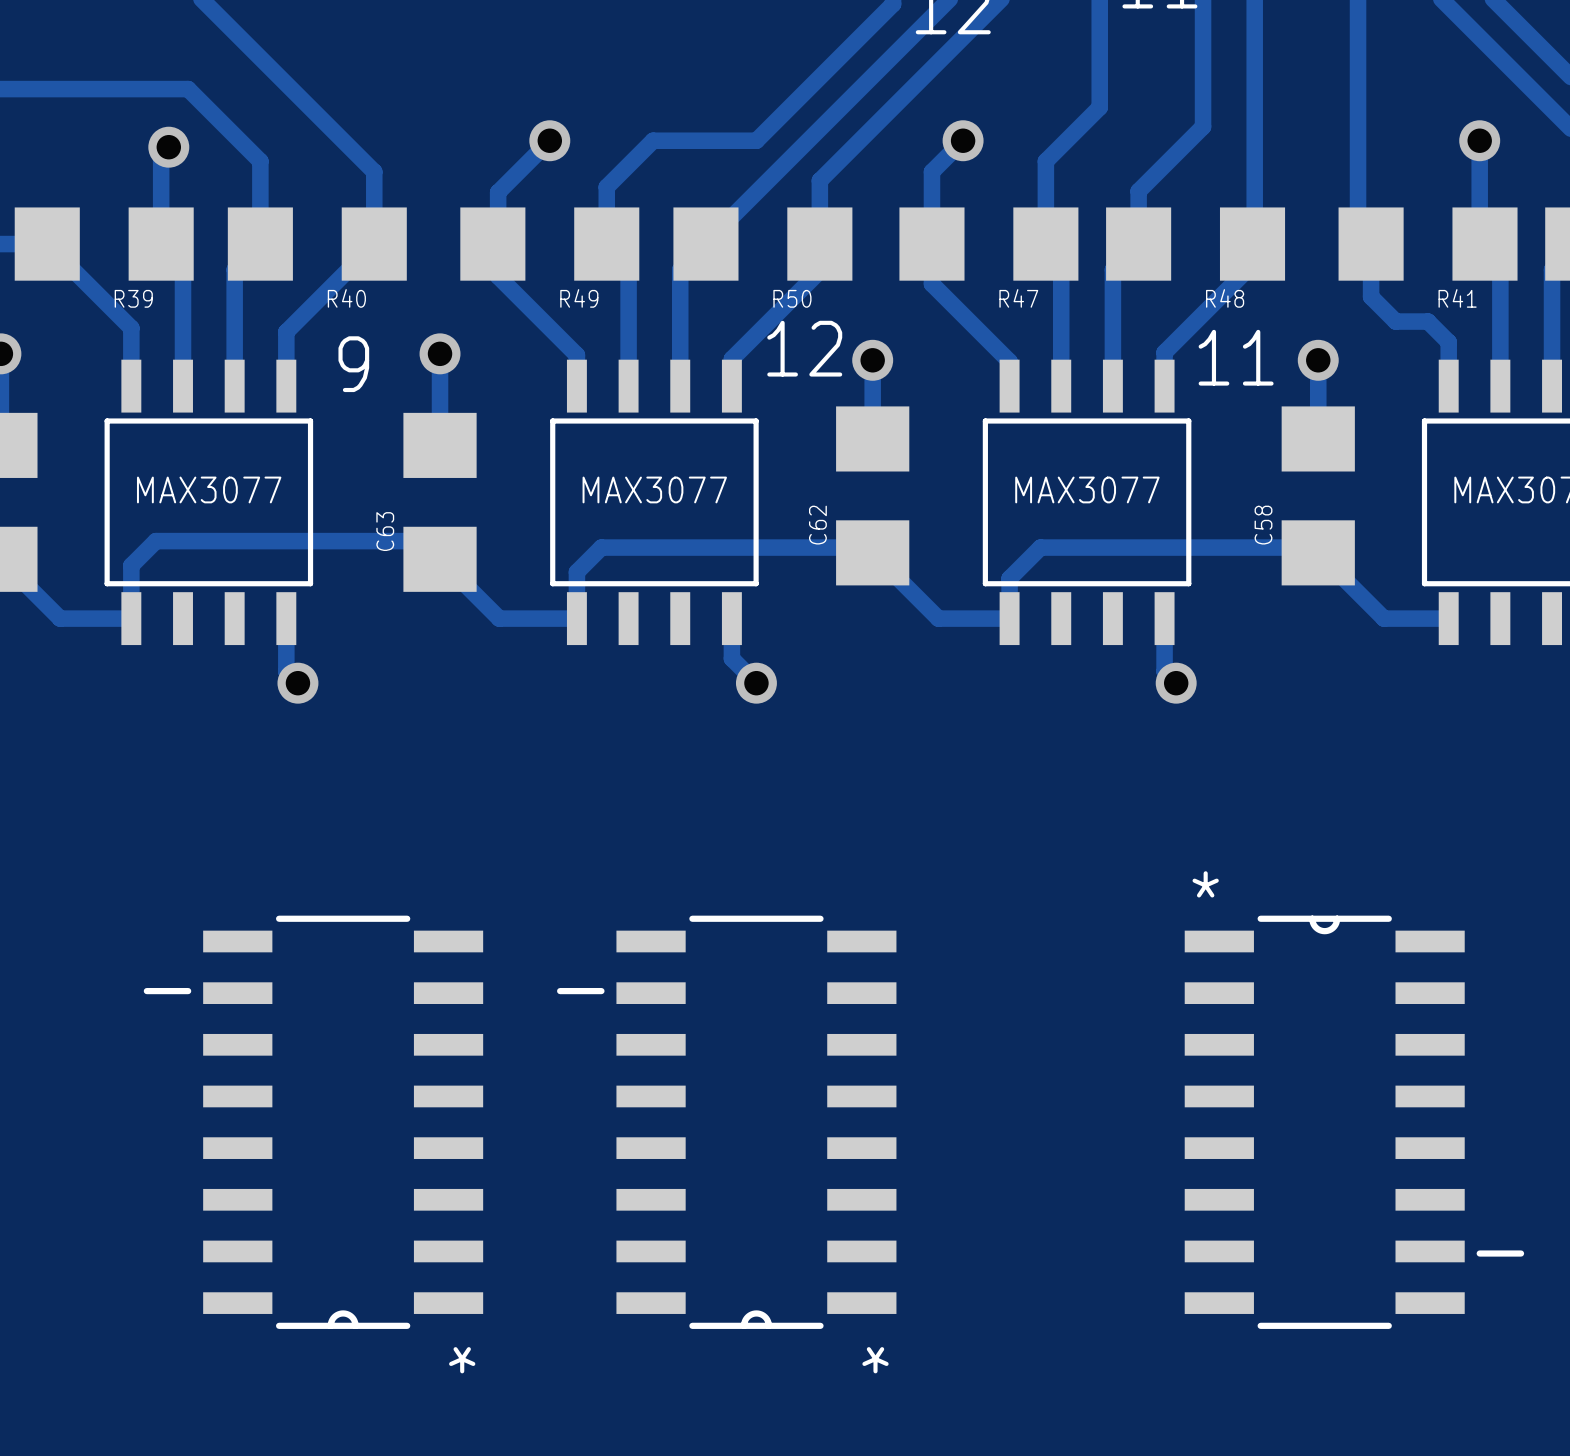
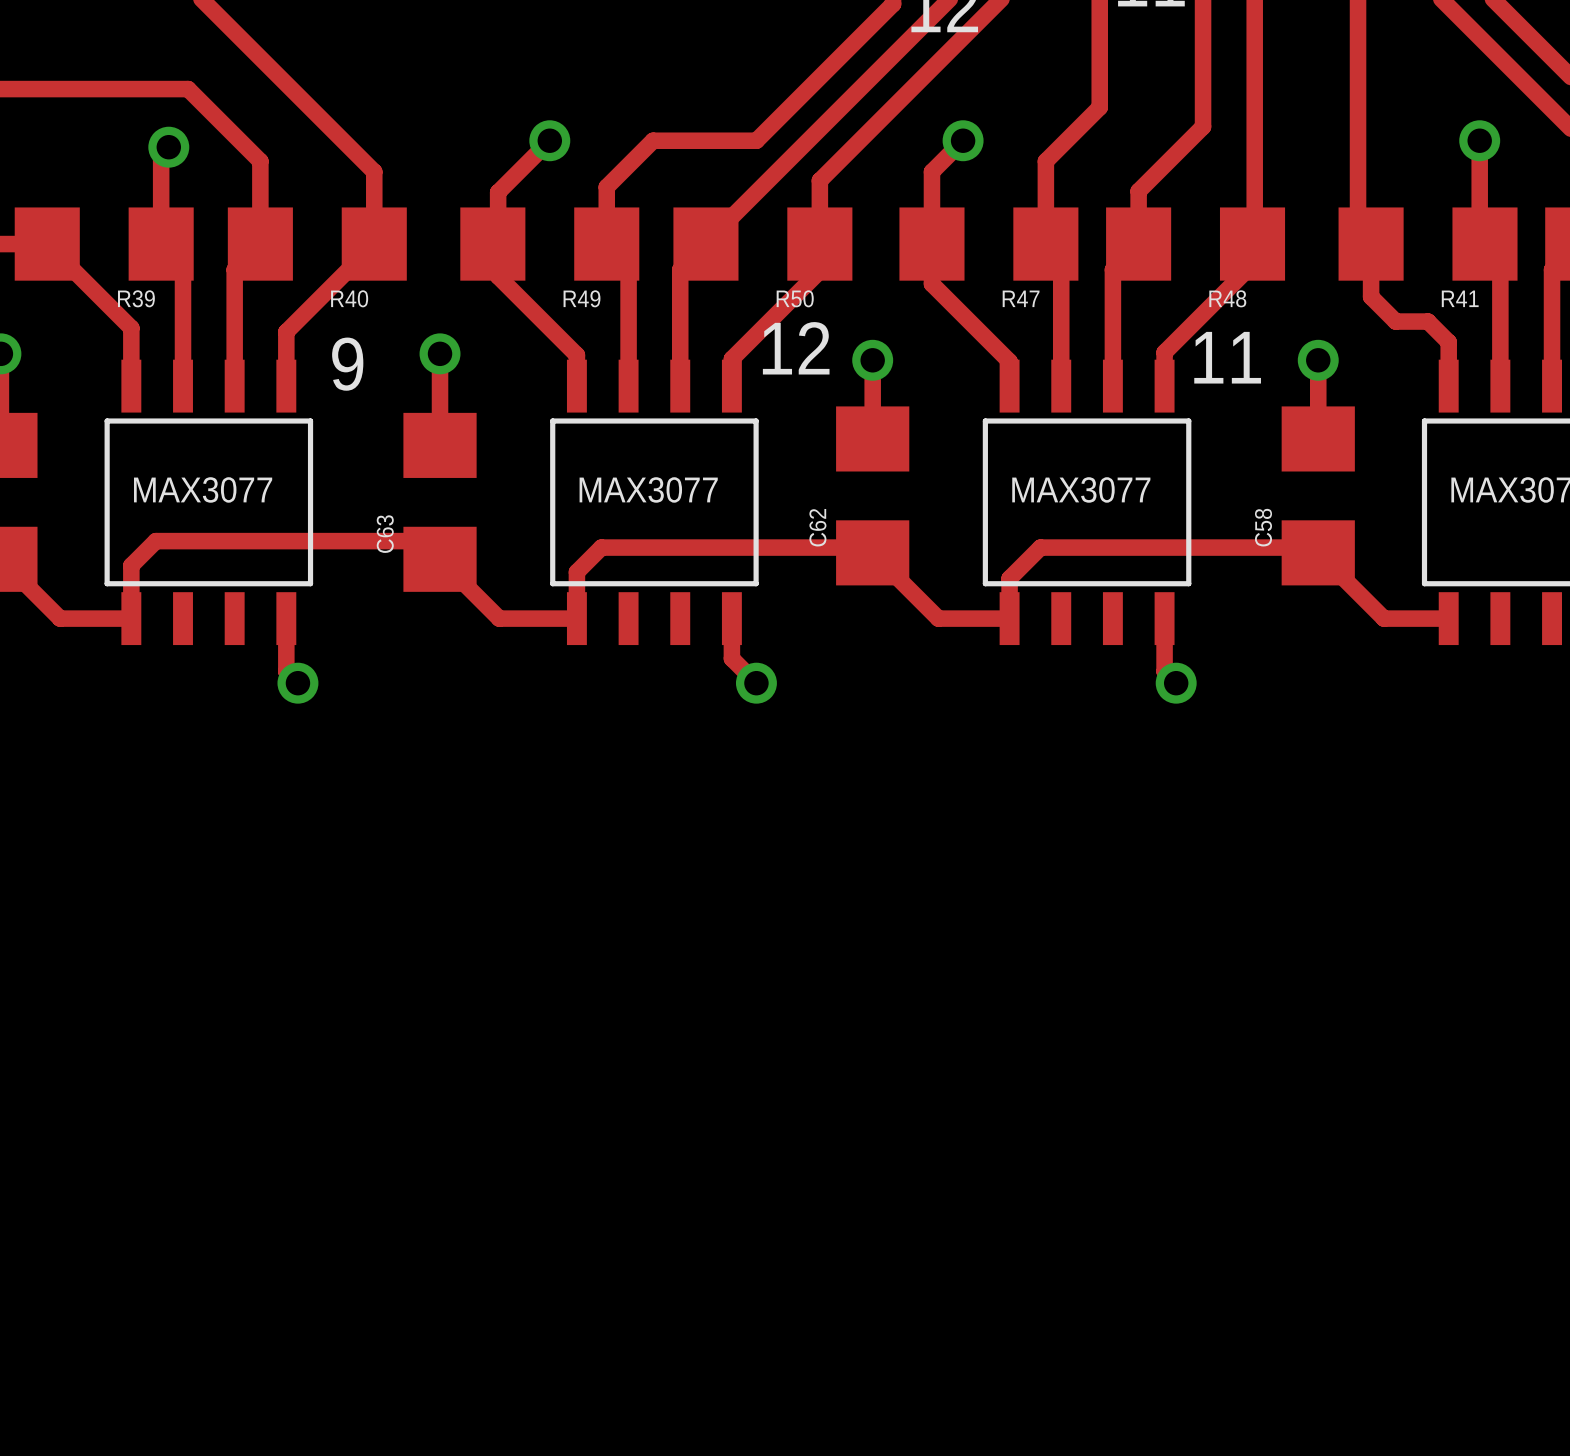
part: (313, 1122) -> none
part: (726, 1122) -> none
part: (1354, 1122) -> none

